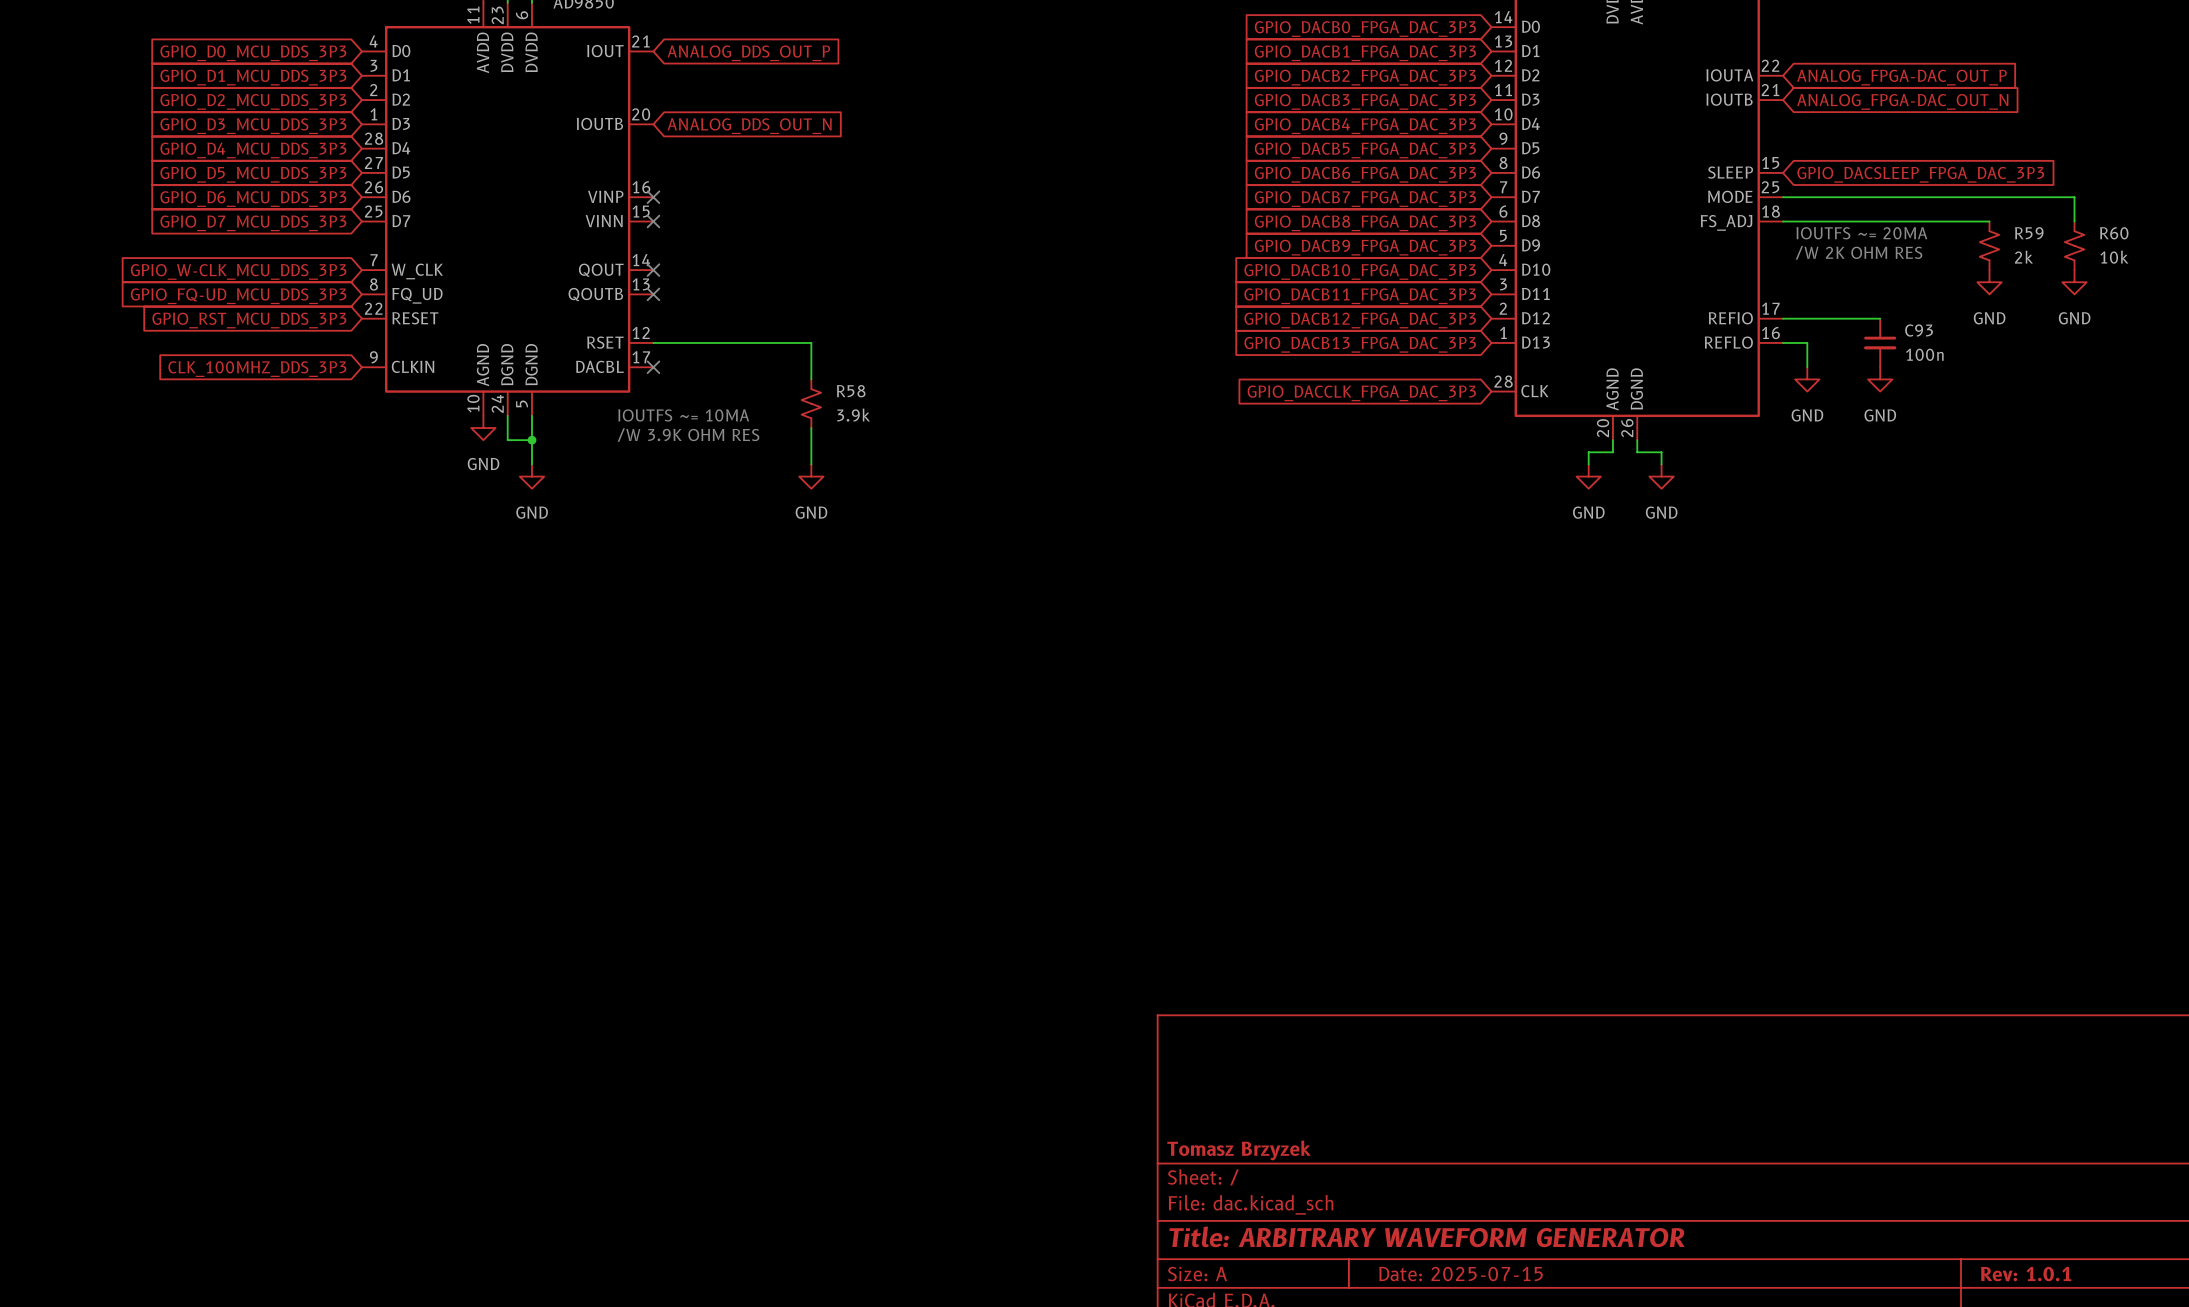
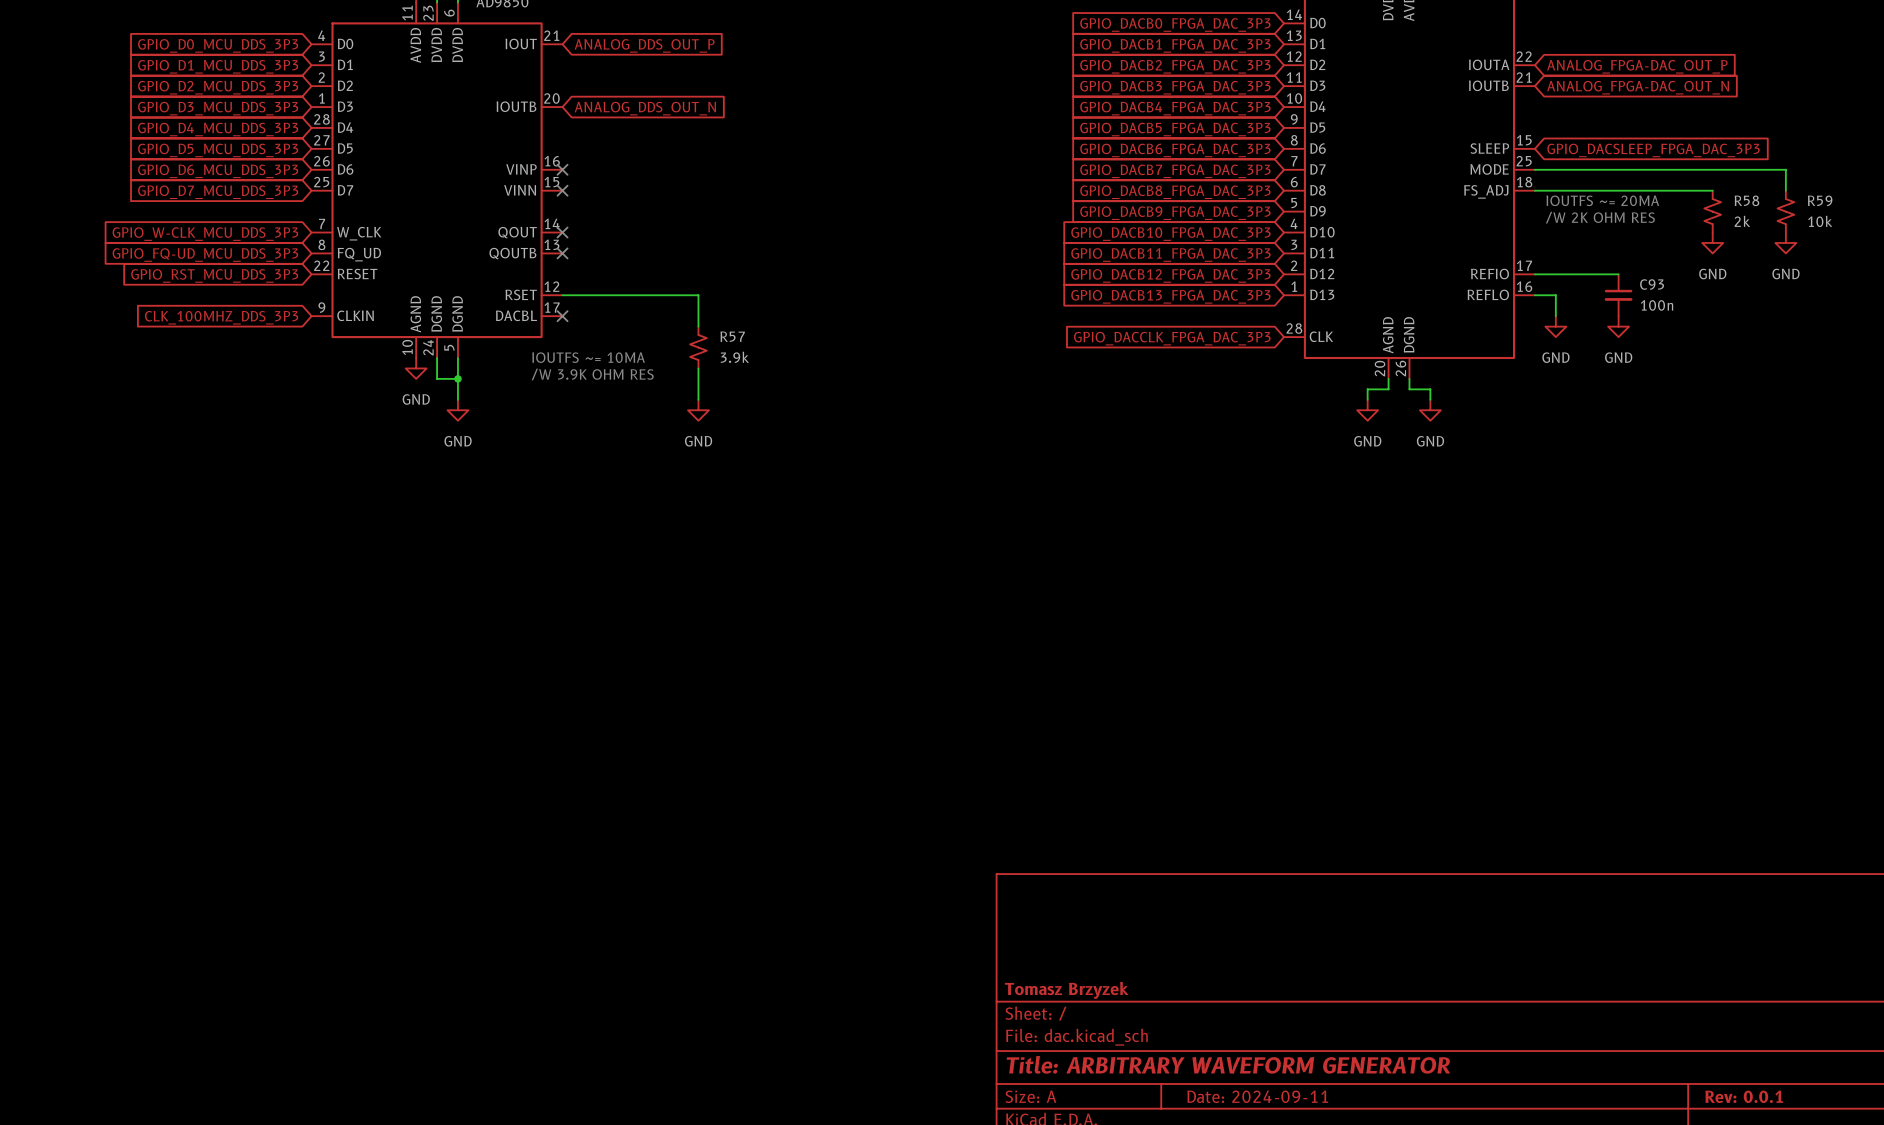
R59 name: R59 (2029, 233) -> R58 (1746, 200)
R60 name: R60 (2114, 233) -> R59 (1820, 200)
R58 name: R58 (851, 391) -> R57 (732, 336)
title block: Date: 2025-07-15 (1460, 1274) -> Date: 2024-09-11 (1257, 1096)
title block: Rev: 1.0.1 (2026, 1274) -> Rev: 0.0.1 (1744, 1096)

